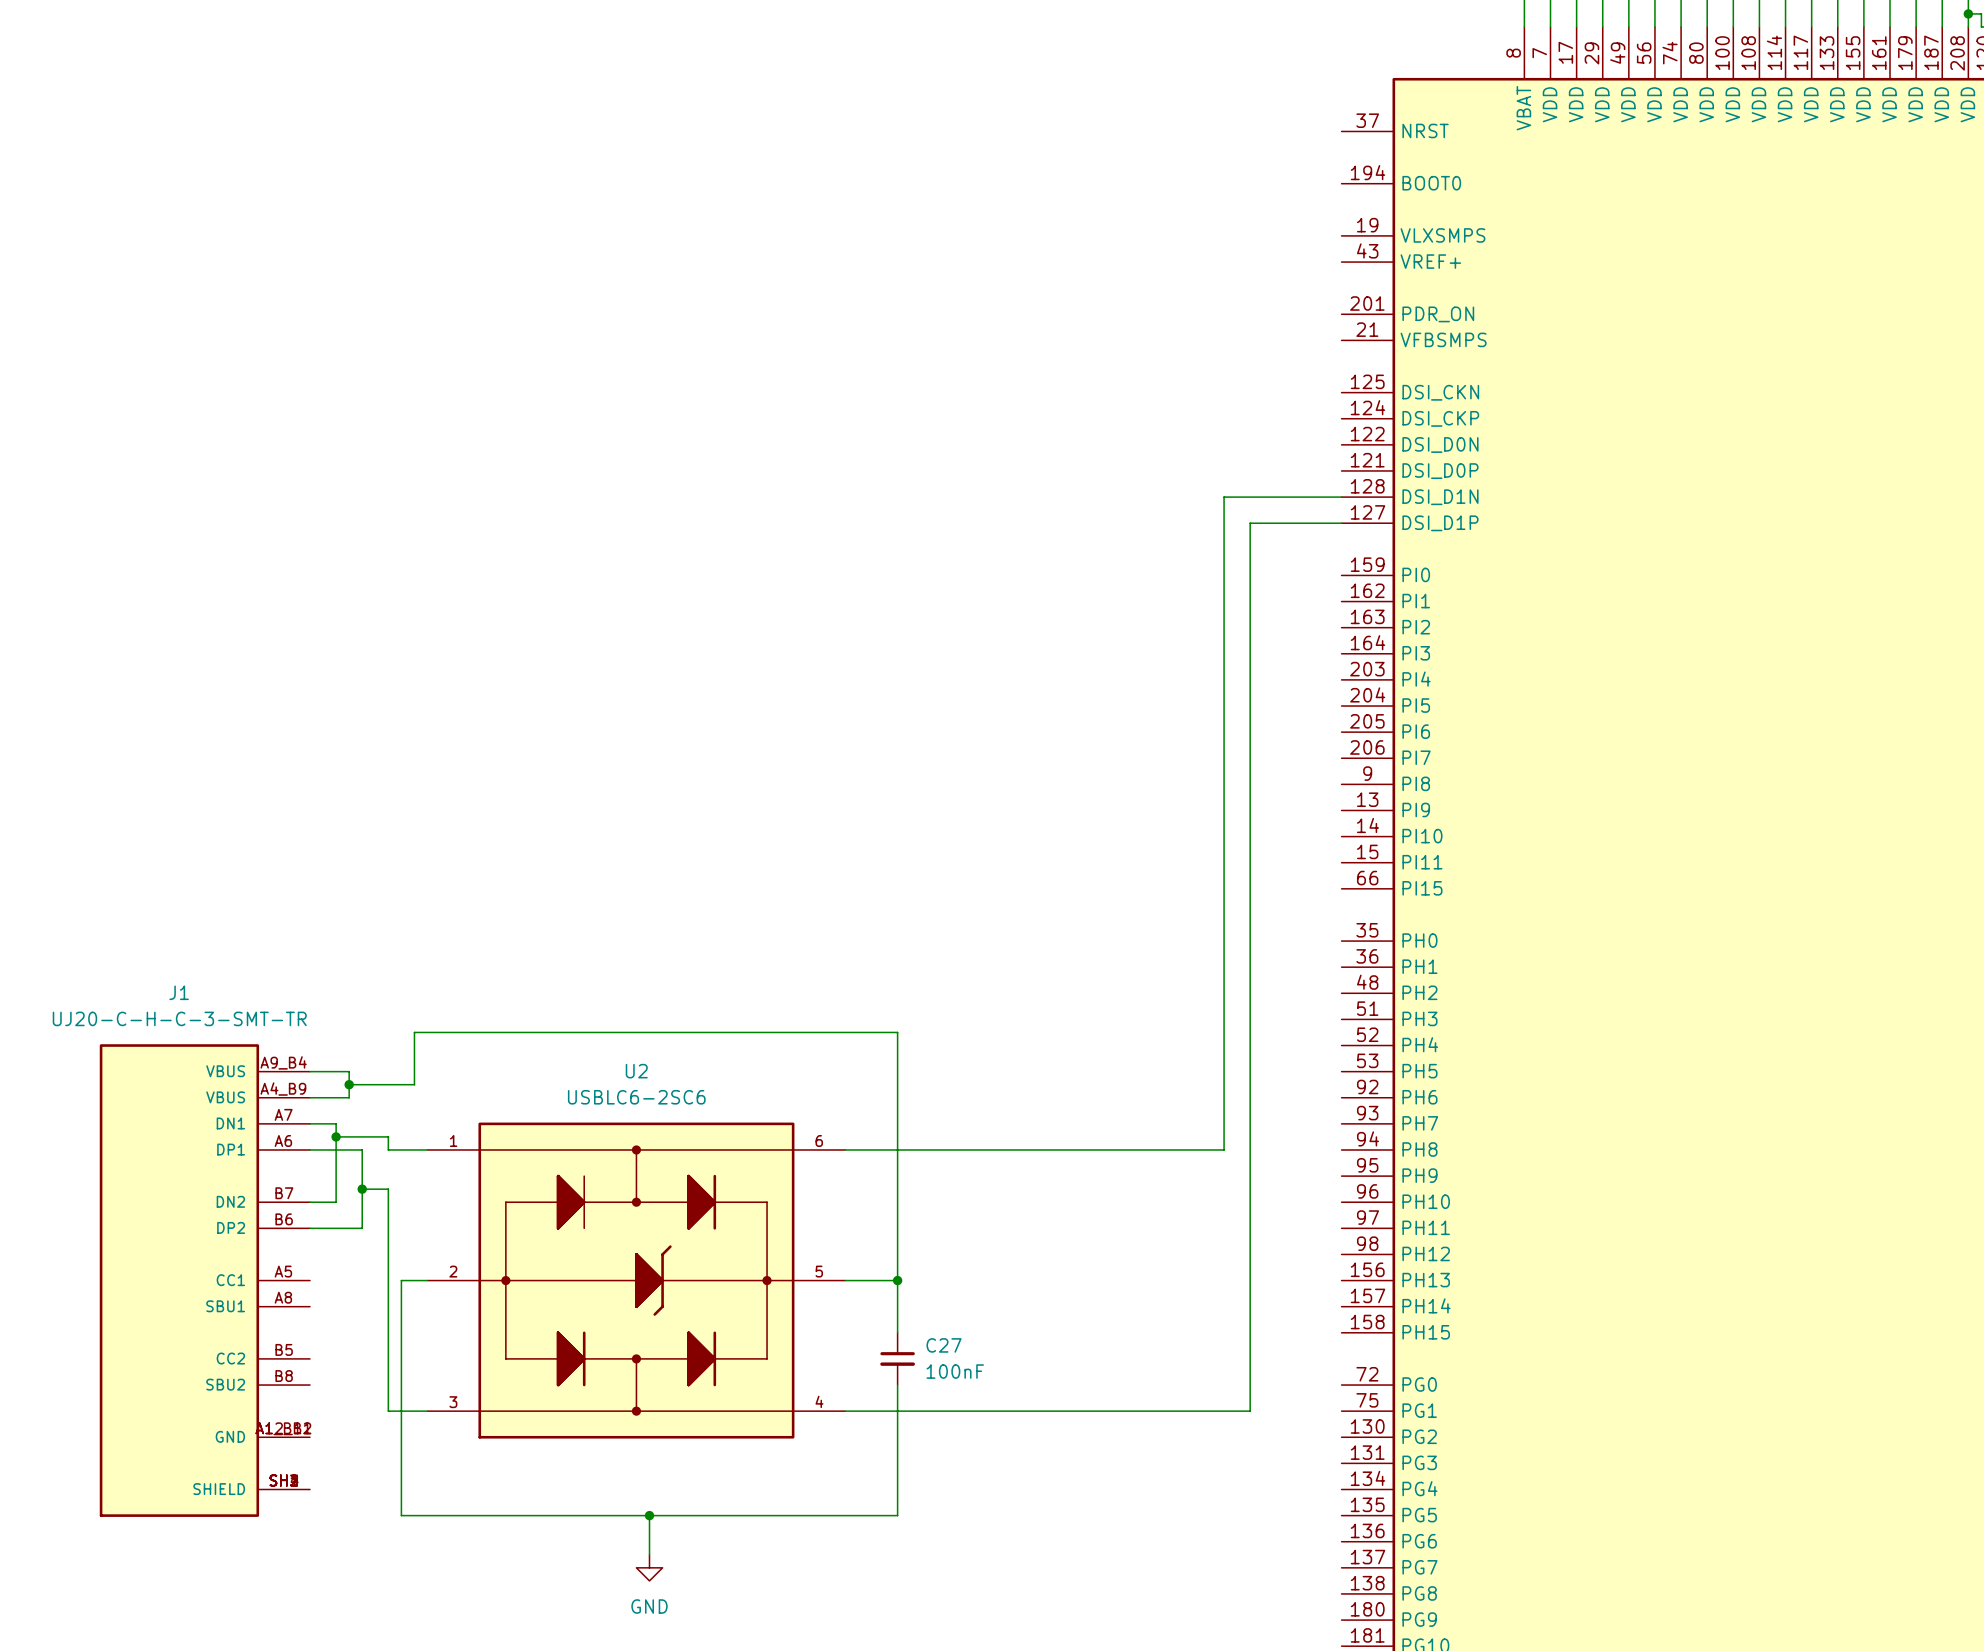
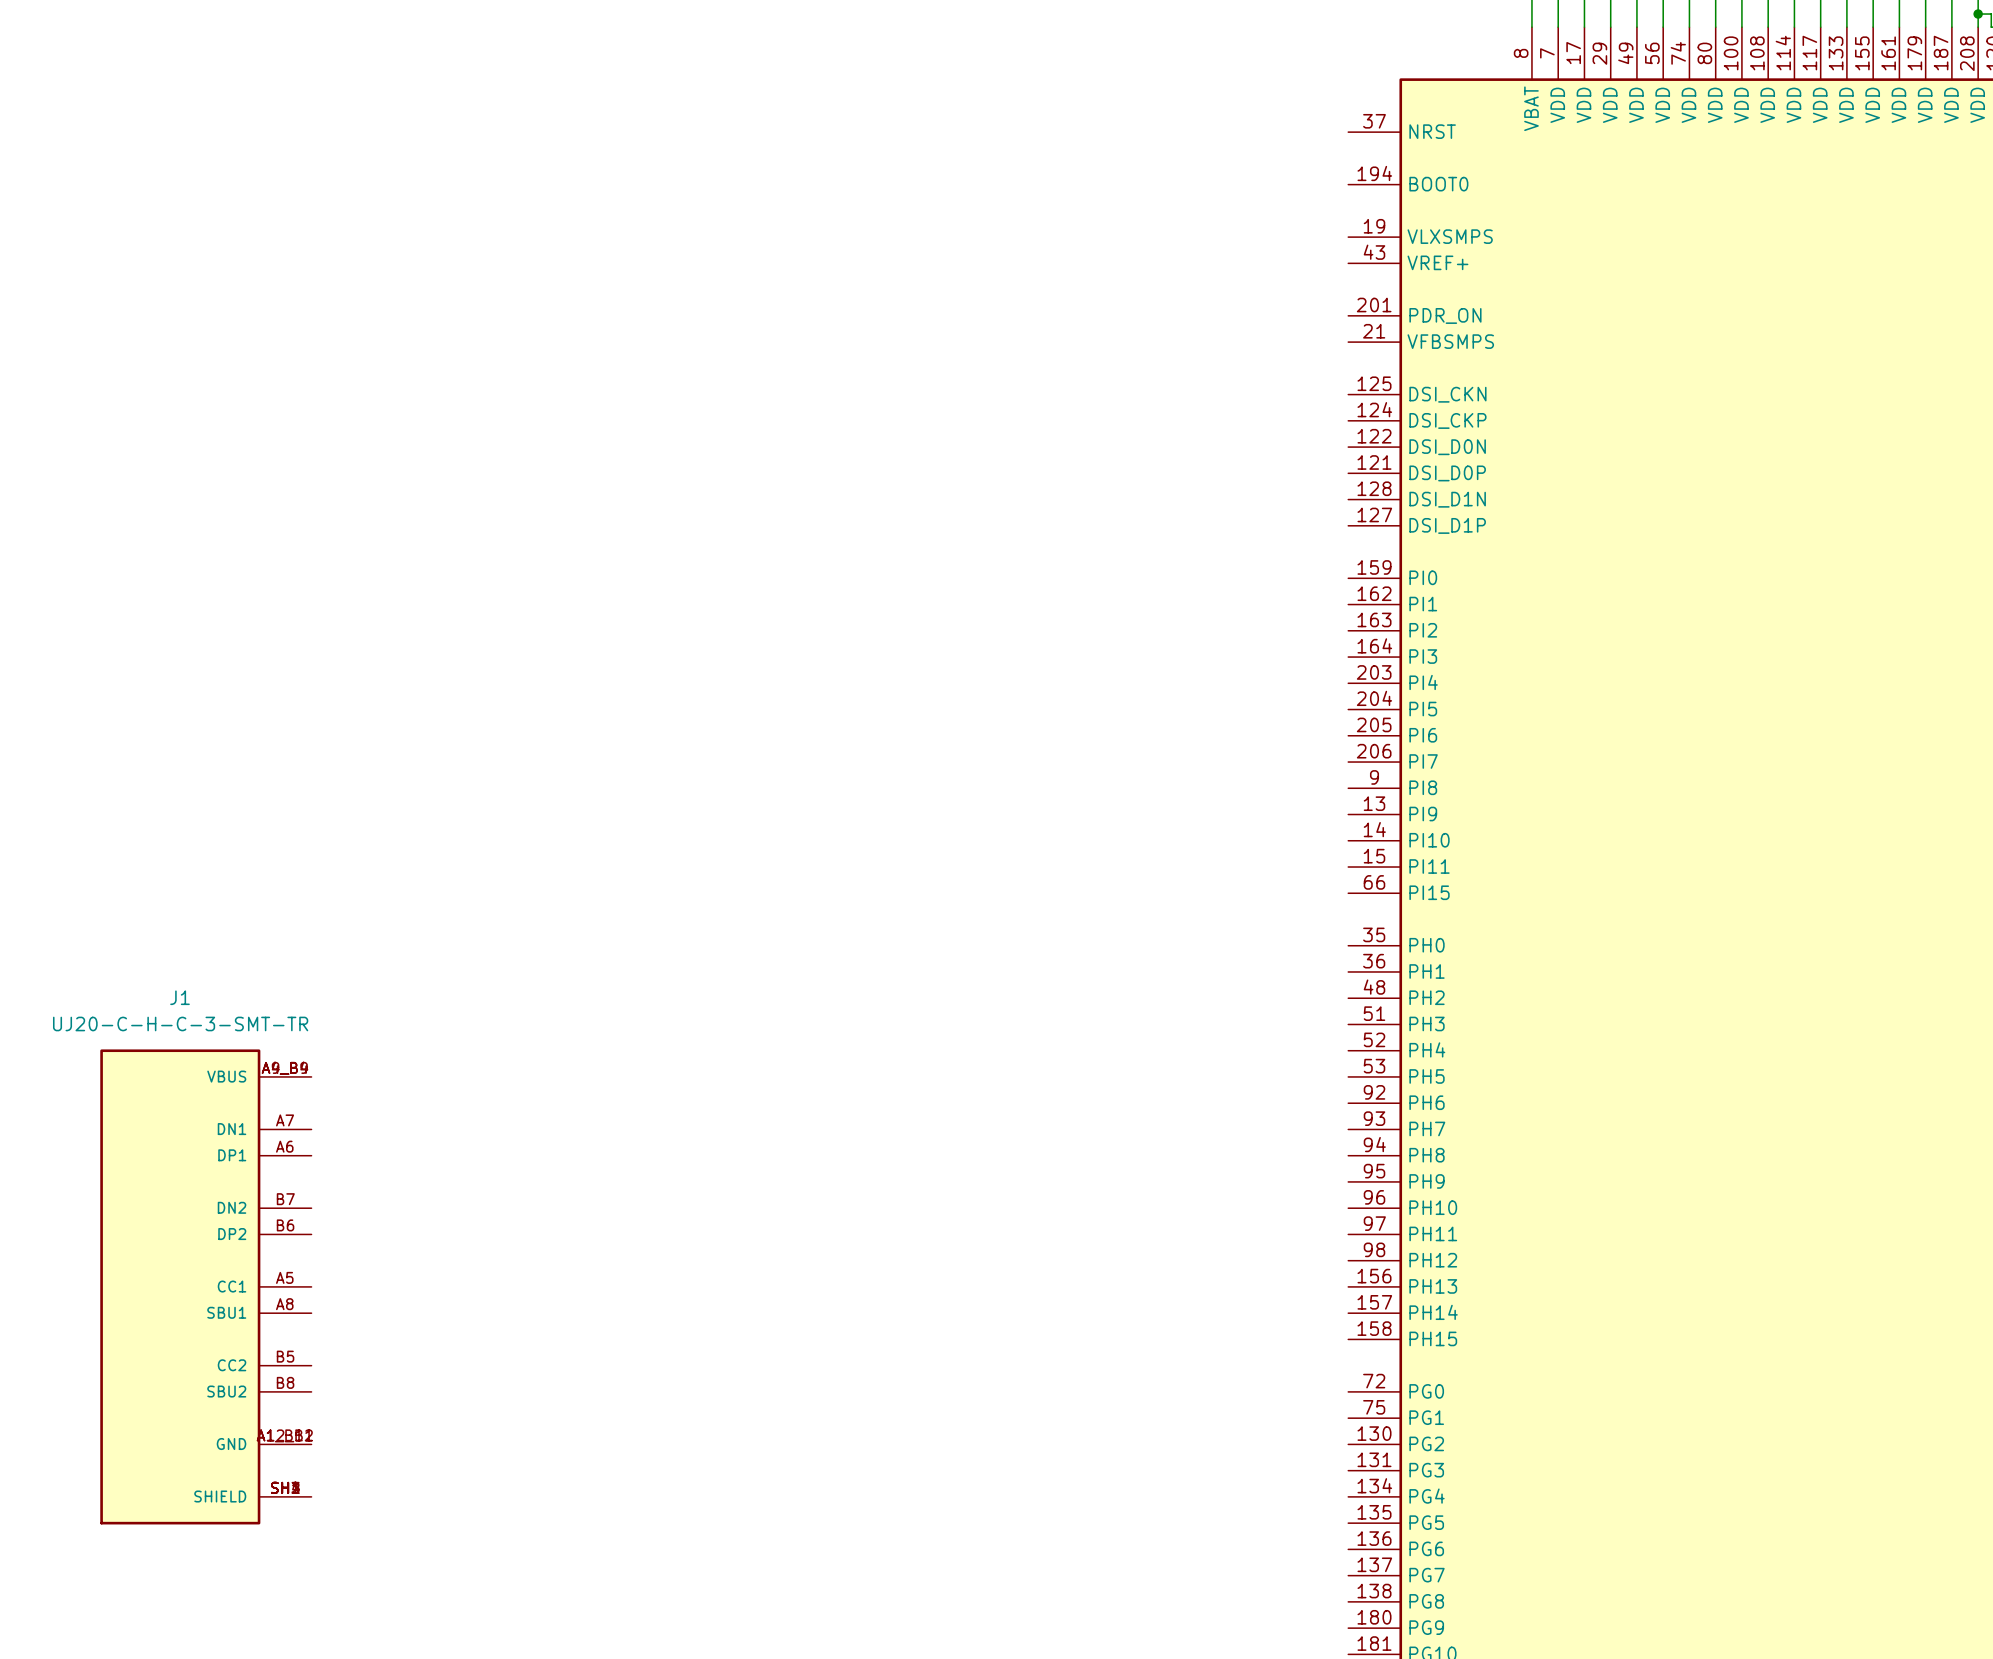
wire: (1341, 497) (1224, 497) (1224, 1149) (845, 1149) -> none
wire: (1341, 523) (1250, 523) (1250, 1411) (845, 1411) -> none
J1 symbol: [99, 1044, 311, 1517] -> [100, 1049, 312, 1525]
wire: (310, 1071) (349, 1071) (349, 1097) (310, 1097) -> none
wire: (349, 1084) (414, 1084) (414, 1032) (897, 1032) (897, 1332) -> none
junction: (349, 1084) -> none
wire: (310, 1123) (336, 1123) (336, 1202) (310, 1202) -> none
wire: (336, 1136) (388, 1136) (388, 1149) (427, 1149) -> none
junction: (336, 1136) -> none
wire: (310, 1149) (362, 1149) (362, 1228) (310, 1228) -> none
wire: (362, 1189) (388, 1189) (388, 1411) (427, 1411) -> none
junction: (362, 1189) -> none
wire: (427, 1280) (401, 1280) (401, 1515) (897, 1515) (897, 1385) -> none
U2: USBLC6-2SC6 (636, 1280) -> none
wire: (845, 1280) (897, 1280) -> none
junction: (897, 1280) -> none
C27: 100nF (897, 1358) -> none
wire: (649, 1515) (649, 1554) -> none
junction: (649, 1515) -> none
power symbol: GND (649, 1567) -> none

